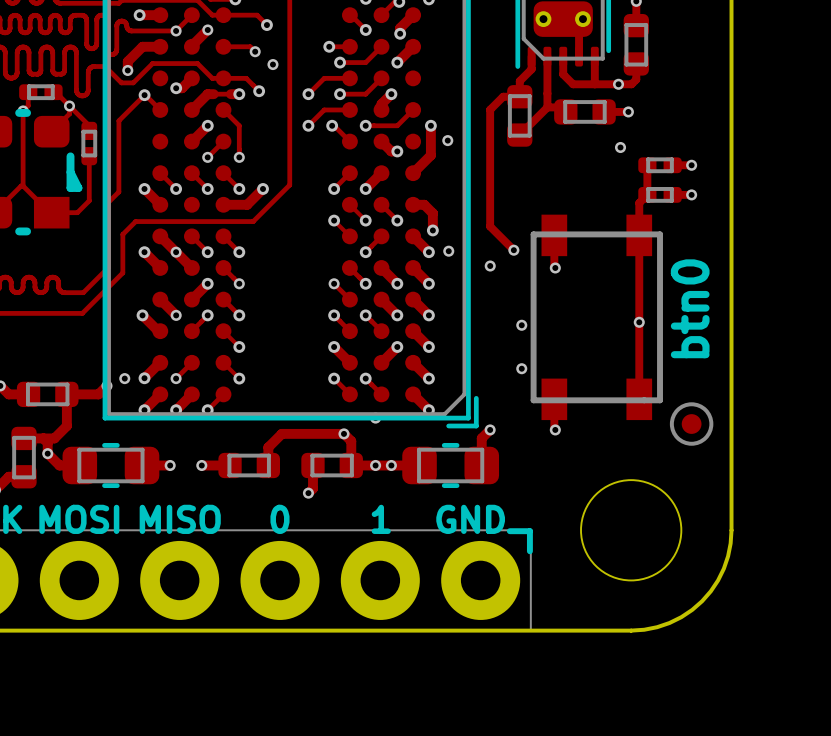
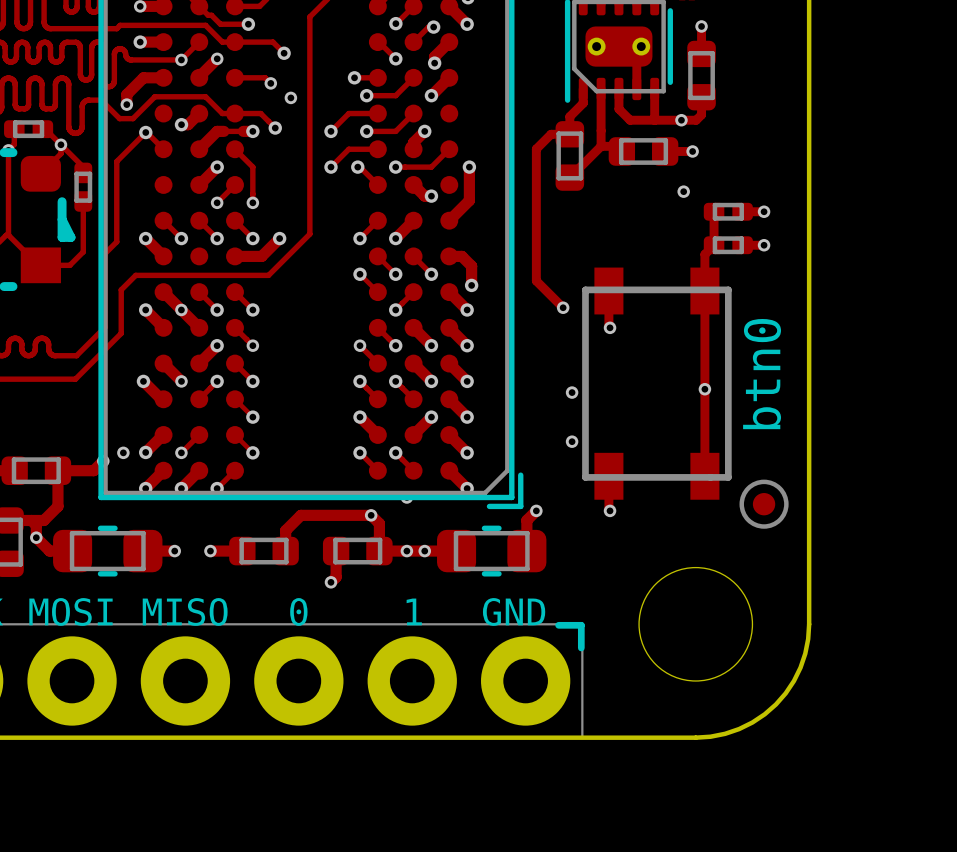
via: (447, 140) -> none
via: (448, 251) -> none
via: (490, 266) -> none

